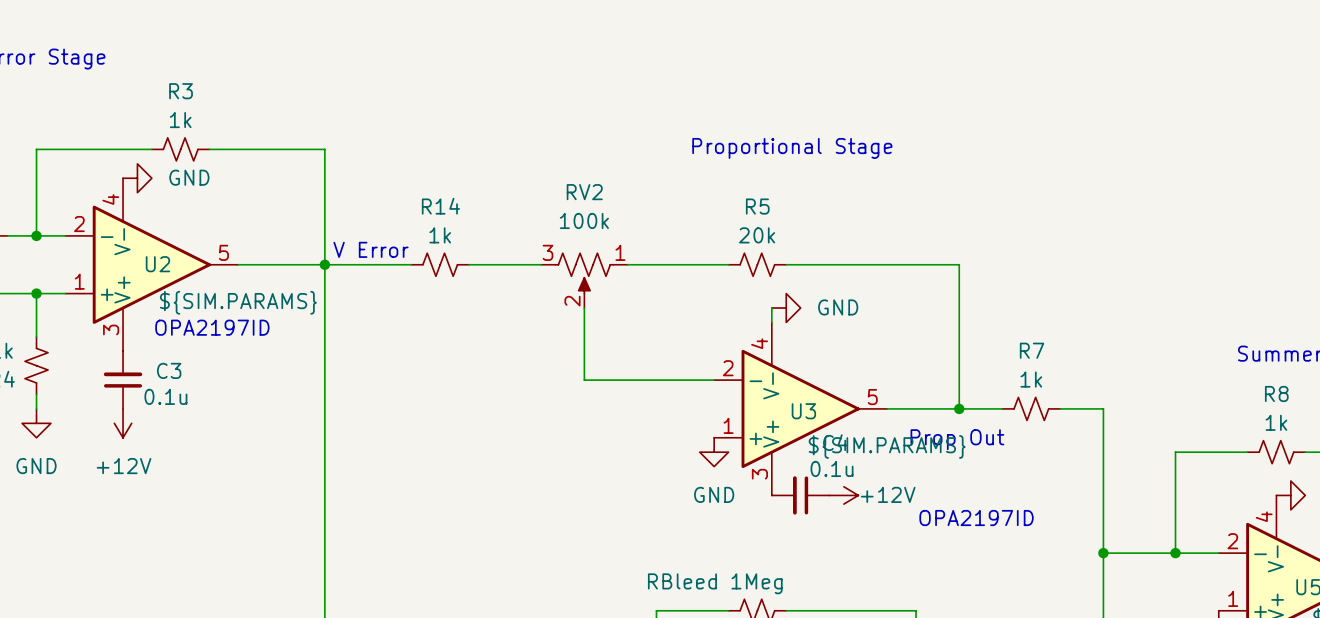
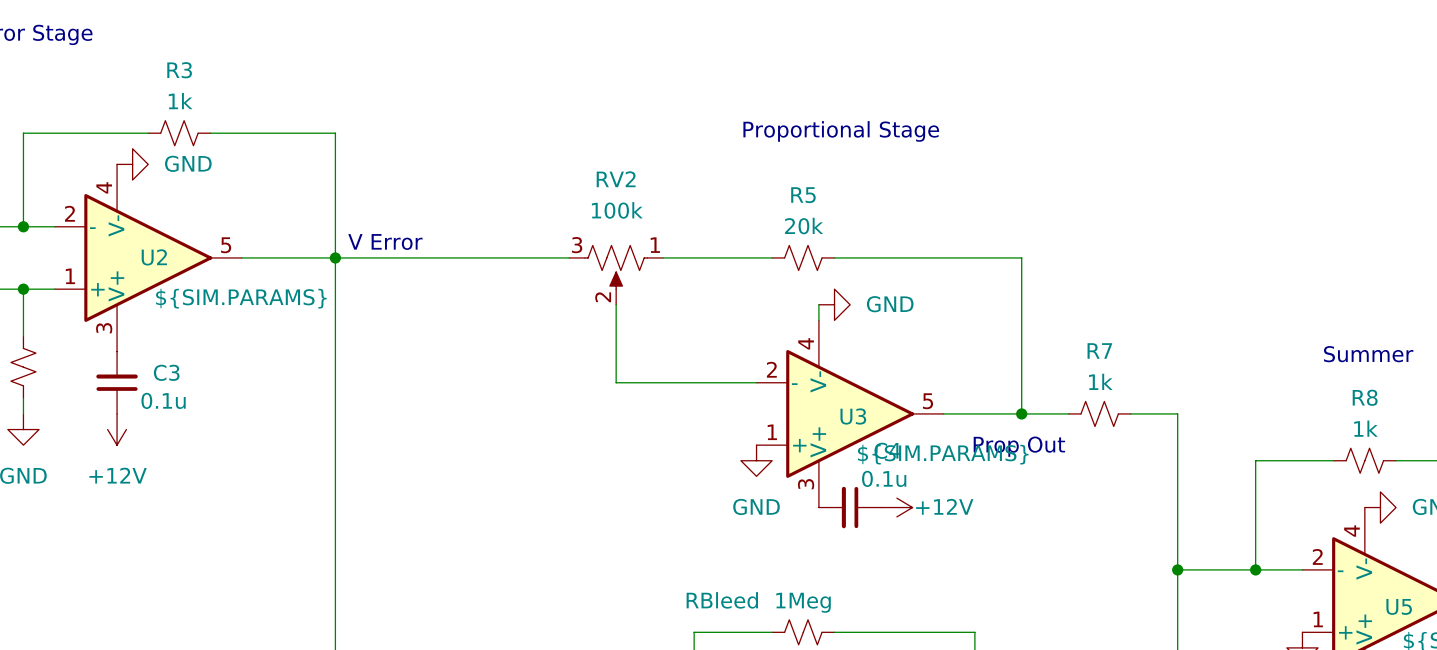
wire: none -> (428, 257) (491, 257)
R14: 1k (440, 264) -> none
text: OPA2197ID (212, 327) -> none
text: OPA2197ID (976, 518) -> none

